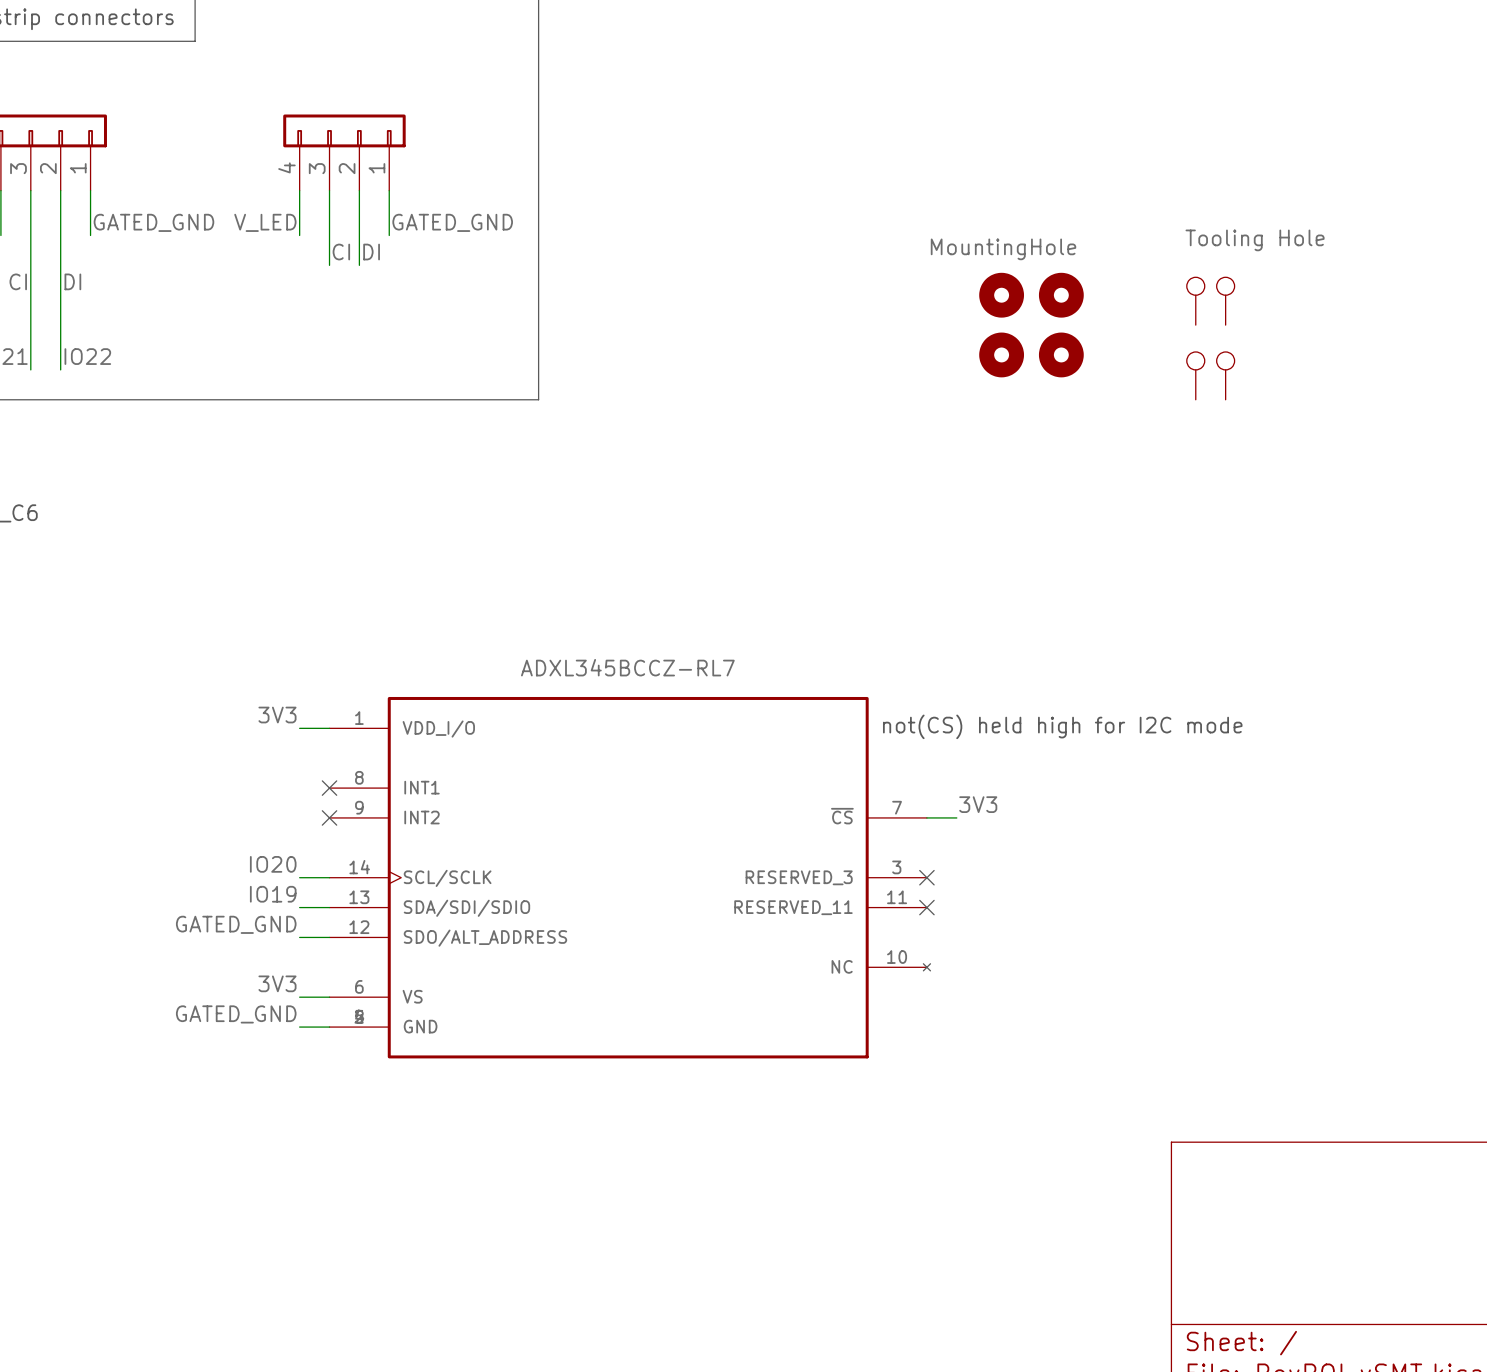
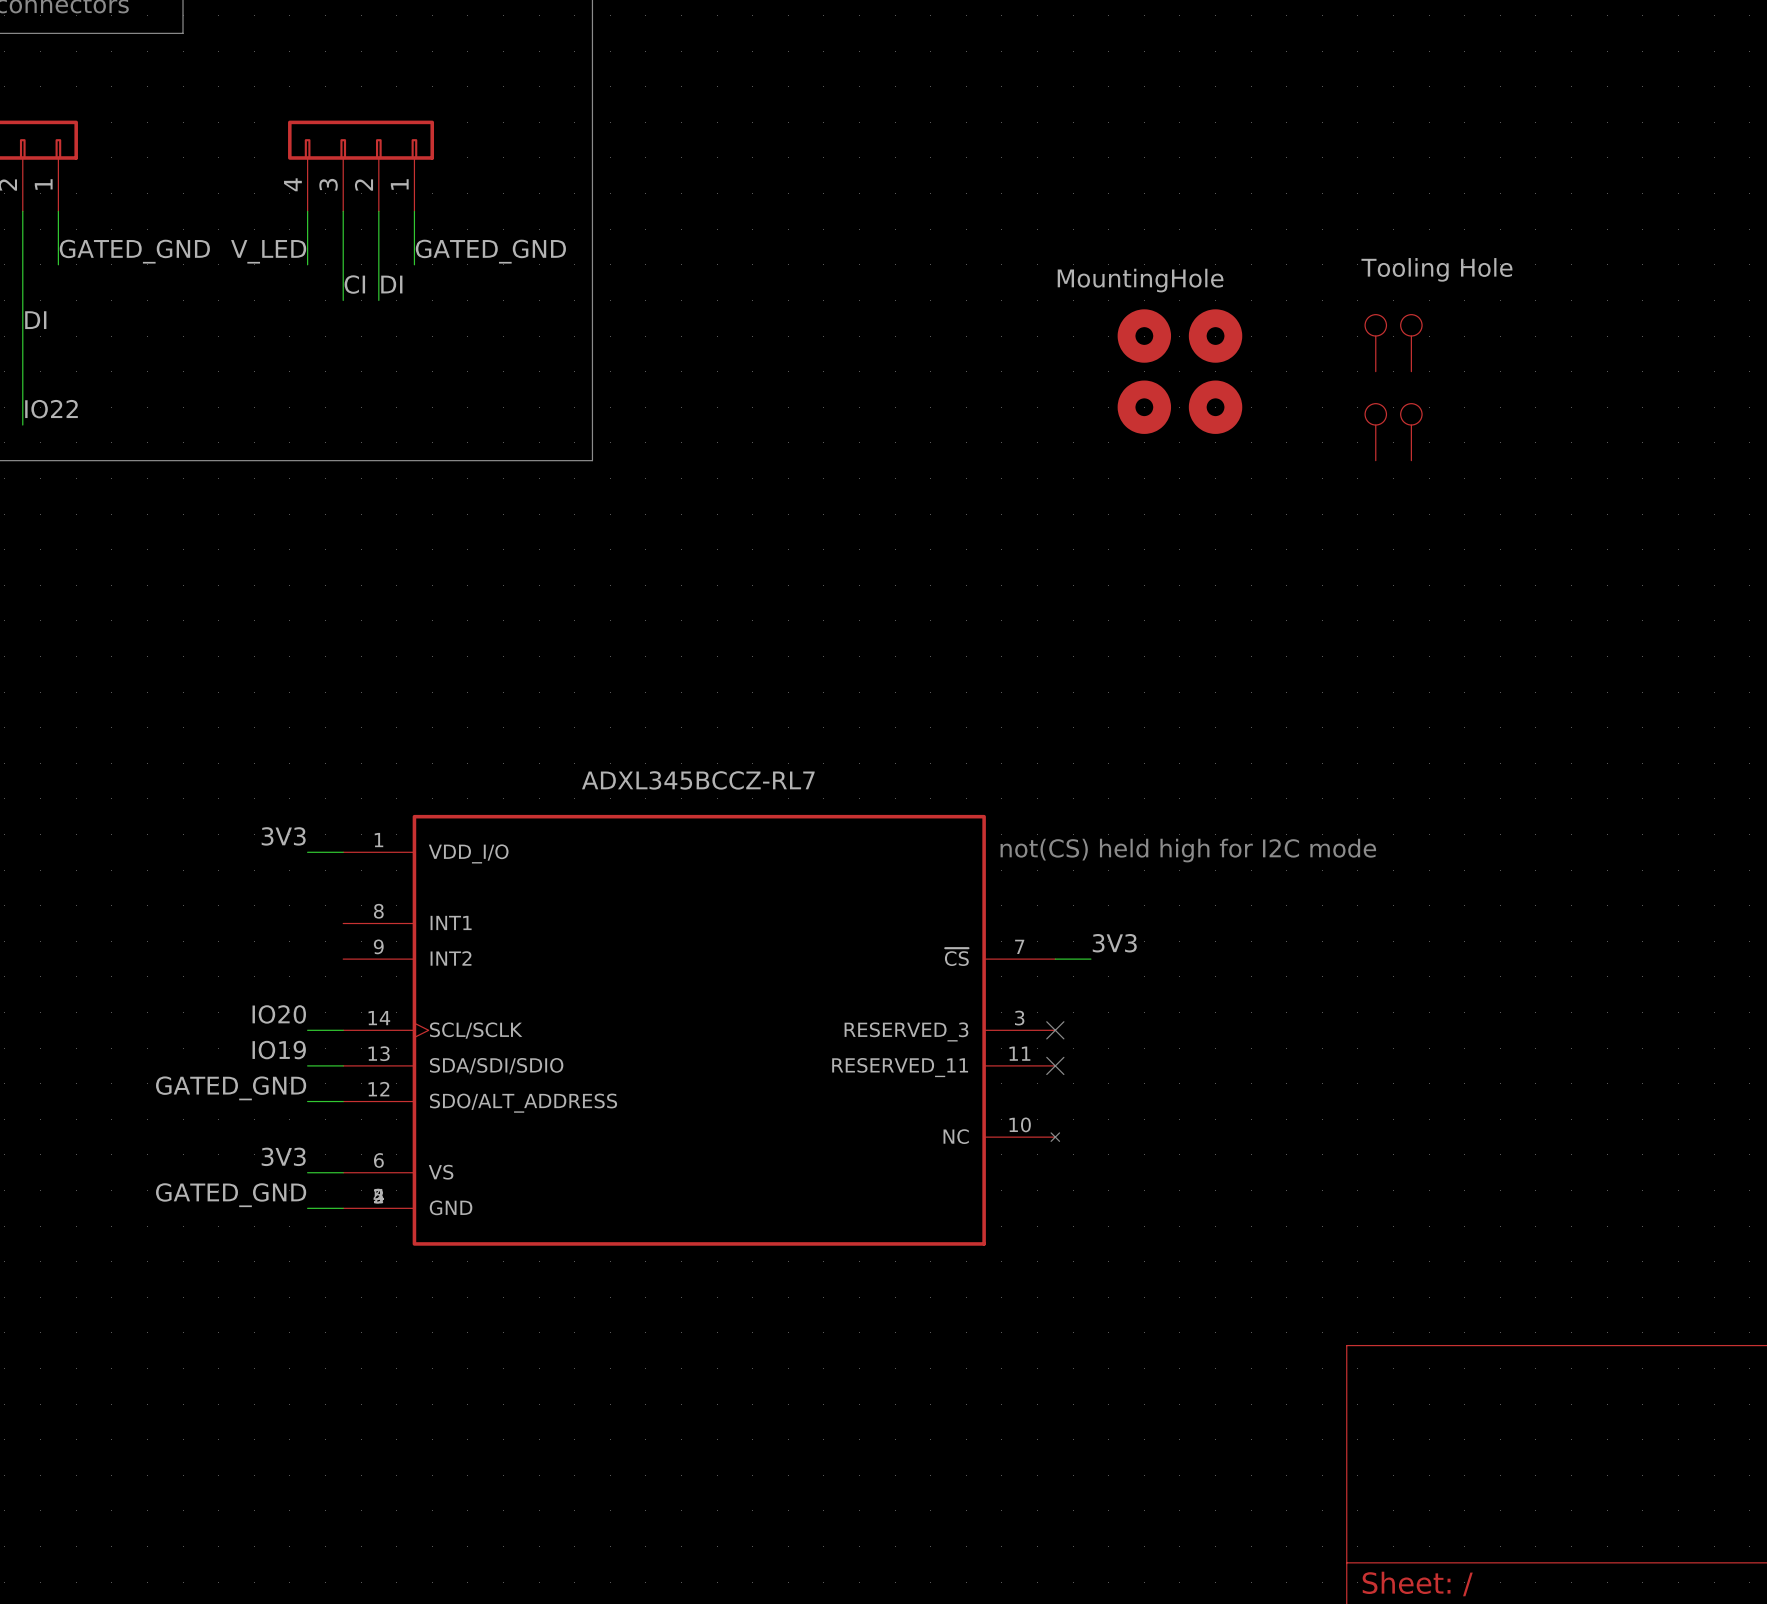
no-connect mark: (329, 788) -> none
no-connect mark: (329, 817) -> none

